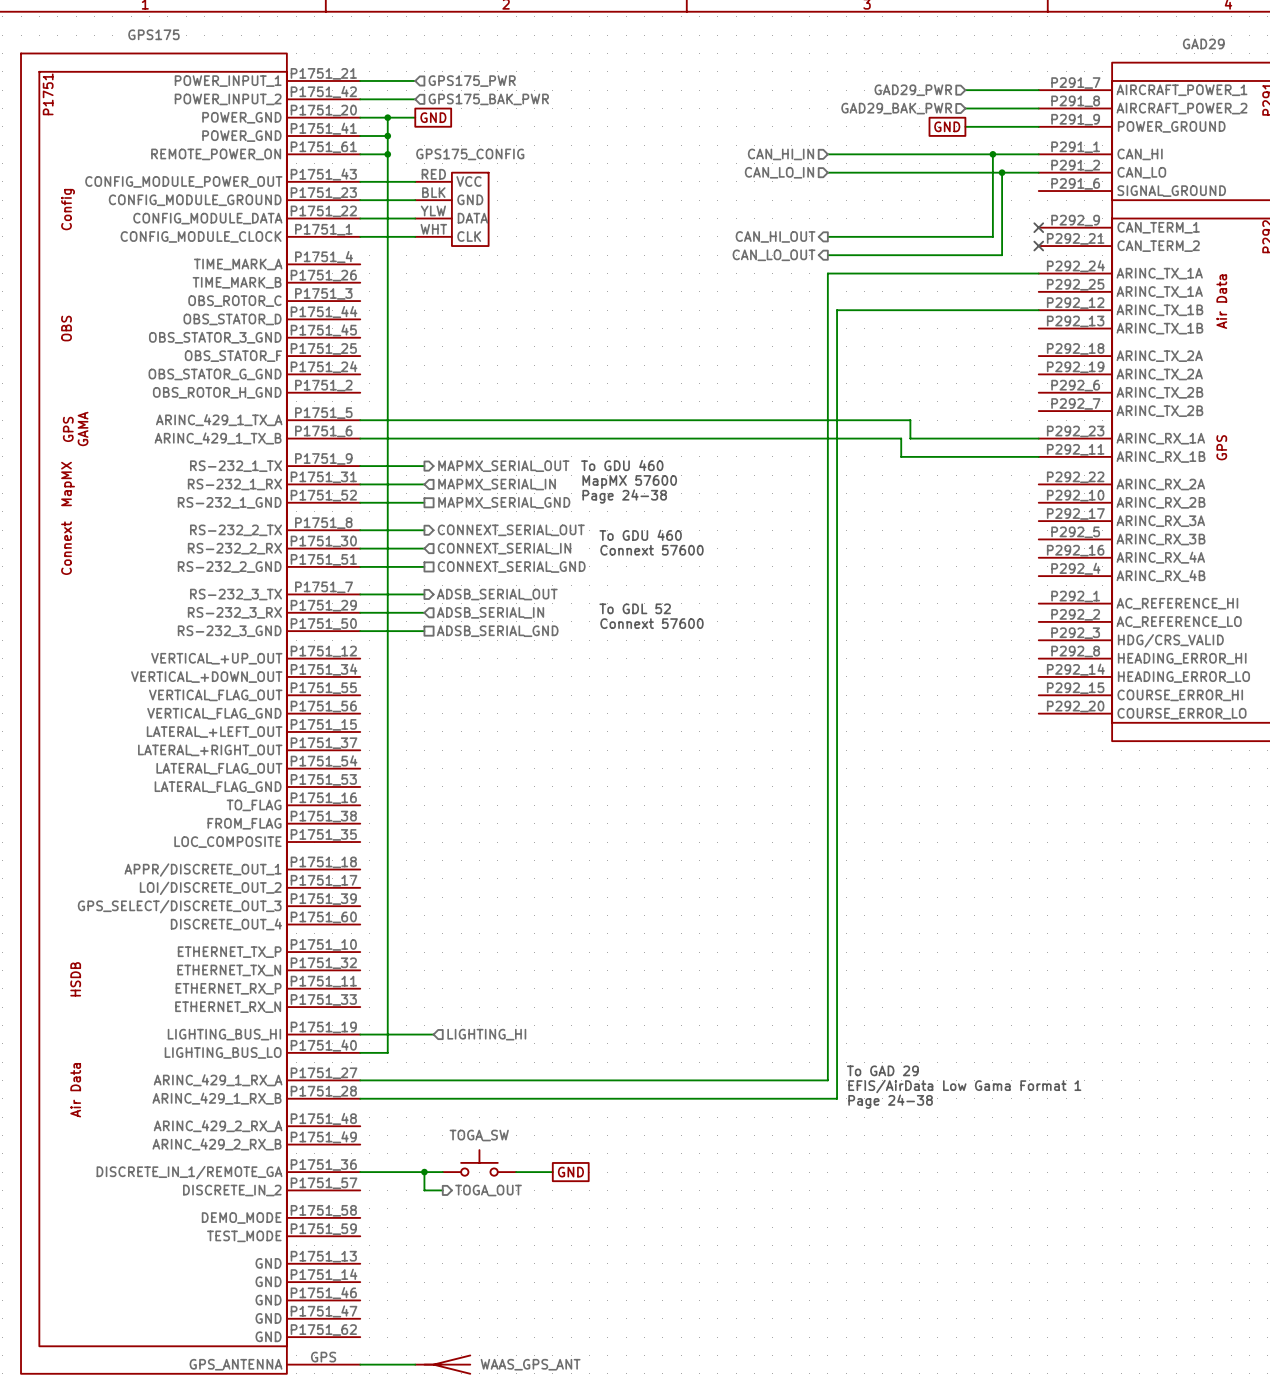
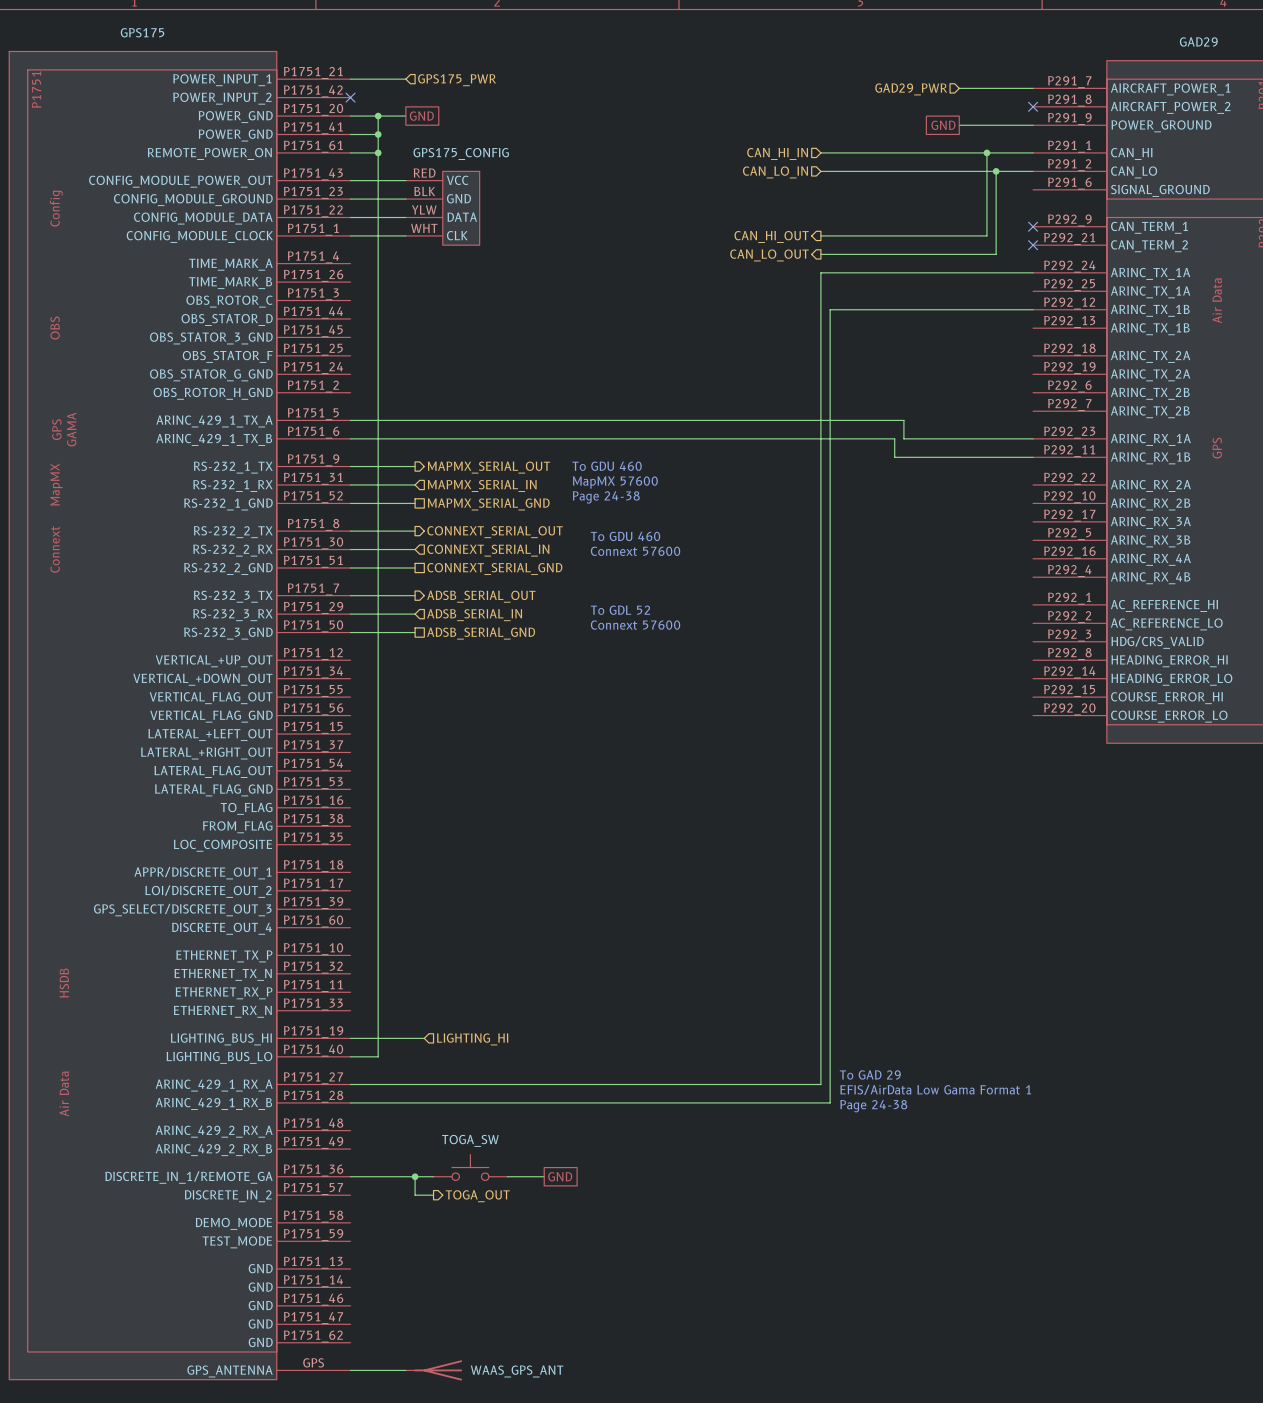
wire: (360, 99) (415, 99) -> none
no-connect mark: none -> (350, 97)
hierarchical label: GPS175_BAK_PWR (488, 99) -> none
hierarchical label: GAD29_BAK_PWR (896, 108) -> none
wire: (965, 108) (1038, 108) -> none
no-connect mark: none -> (1033, 106)

